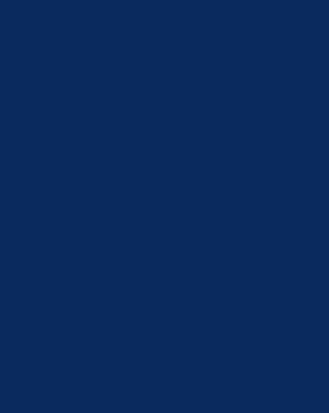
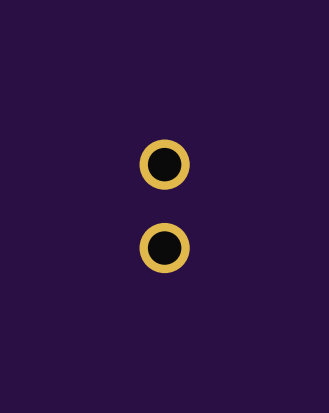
part: none -> (164, 206)

